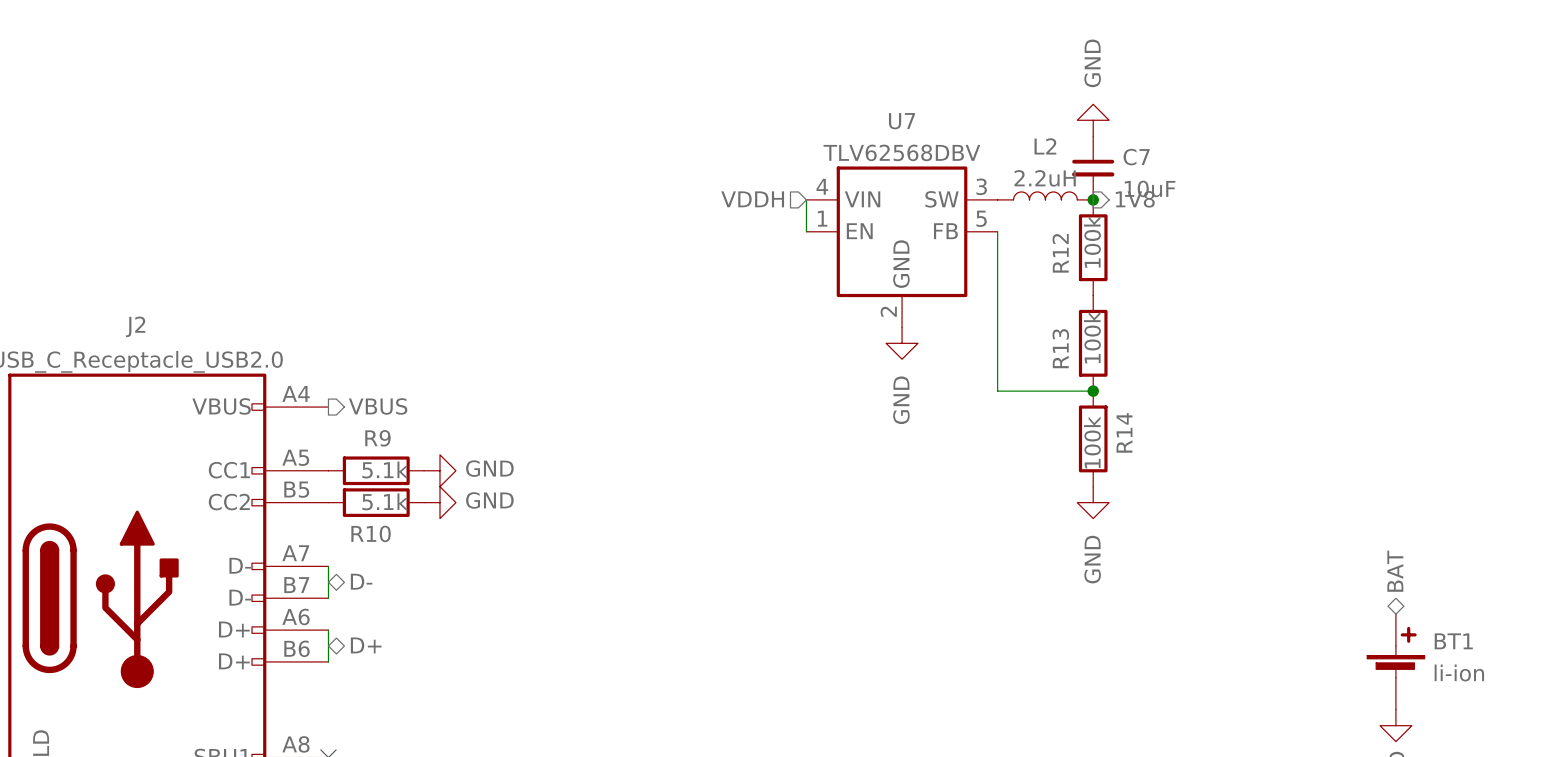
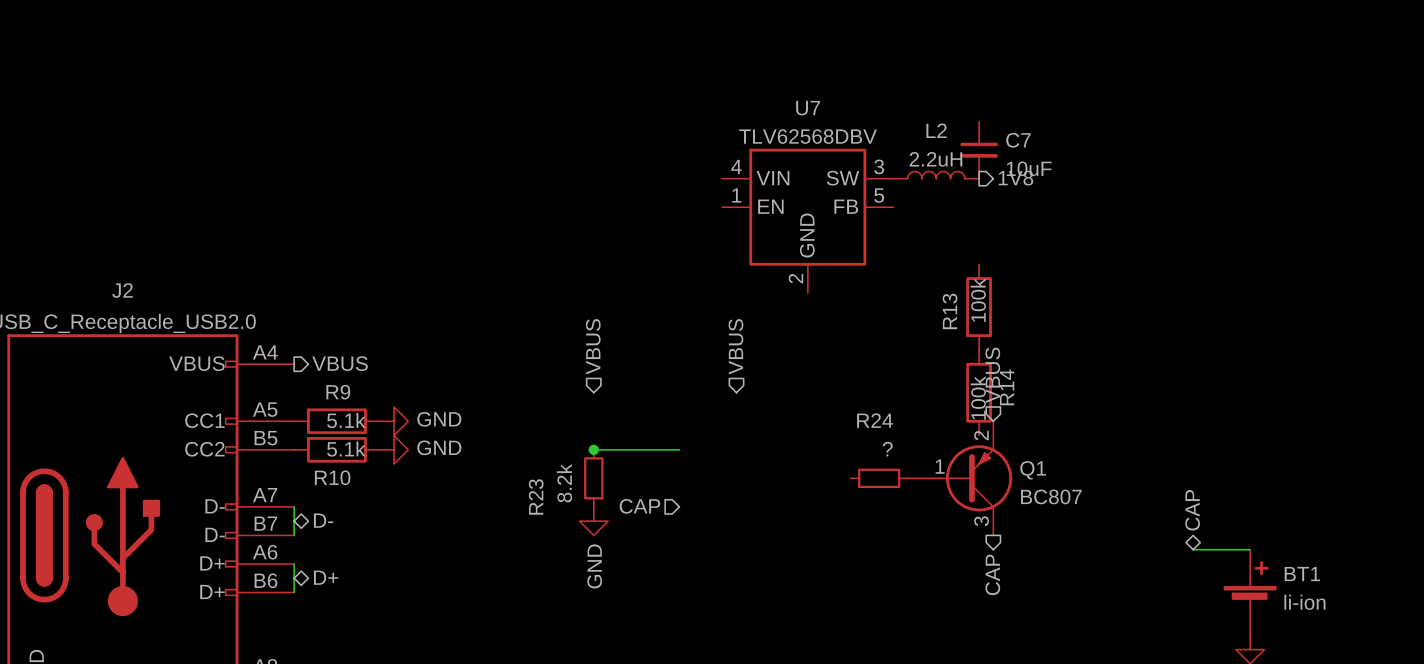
power symbol: GND (1093, 120) -> none
hierarchical label: VDDH (752, 199) -> none
wire: (806, 199) (806, 231) -> none
junction: (1093, 199) -> none
wire: (997, 231) (997, 391) (1093, 391) -> none
R12: 100k (1093, 247) -> none
power symbol: GND (902, 343) -> none
hierarchical label: none -> VBUS (593, 346)
hierarchical label: none -> VBUS (735, 346)
junction: (1093, 391) -> none
hierarchical label: none -> VBUS (992, 375)
wire: none -> (593, 449) (679, 449)
junction: none -> (593, 449)
power symbol: GND (1093, 502) -> none
R23: none -> 8.2k (593, 478)
R24: none -> ? (879, 478)
Q1: none -> BC807 (959, 478)
hierarchical label: none -> CAP (639, 506)
hierarchical label: BAT (1395, 571) -> none
hierarchical label: none -> CAP (1192, 510)
power symbol: none -> GND (593, 521)
wire: none -> (1193, 549) (1250, 549)
hierarchical label: none -> CAP (992, 574)

